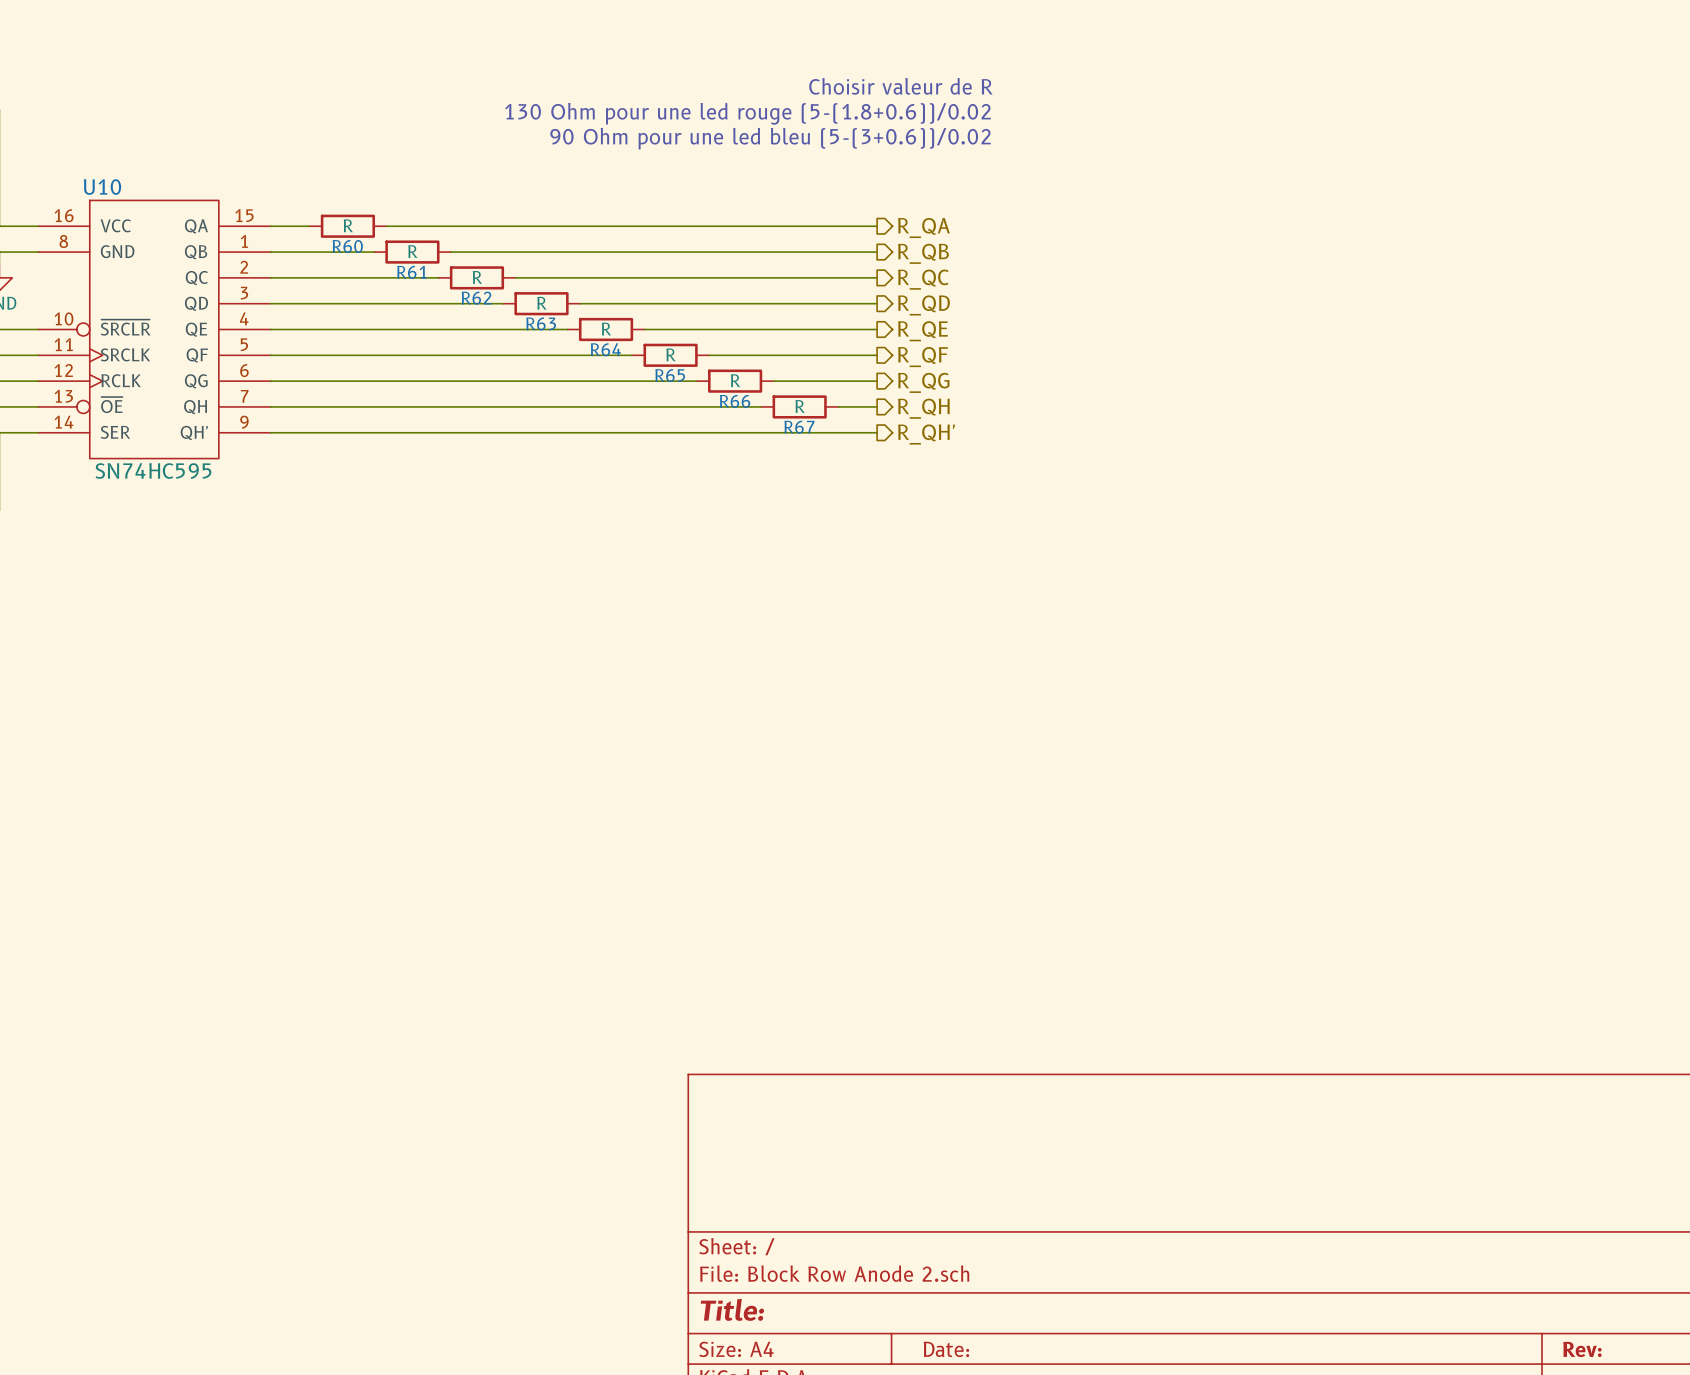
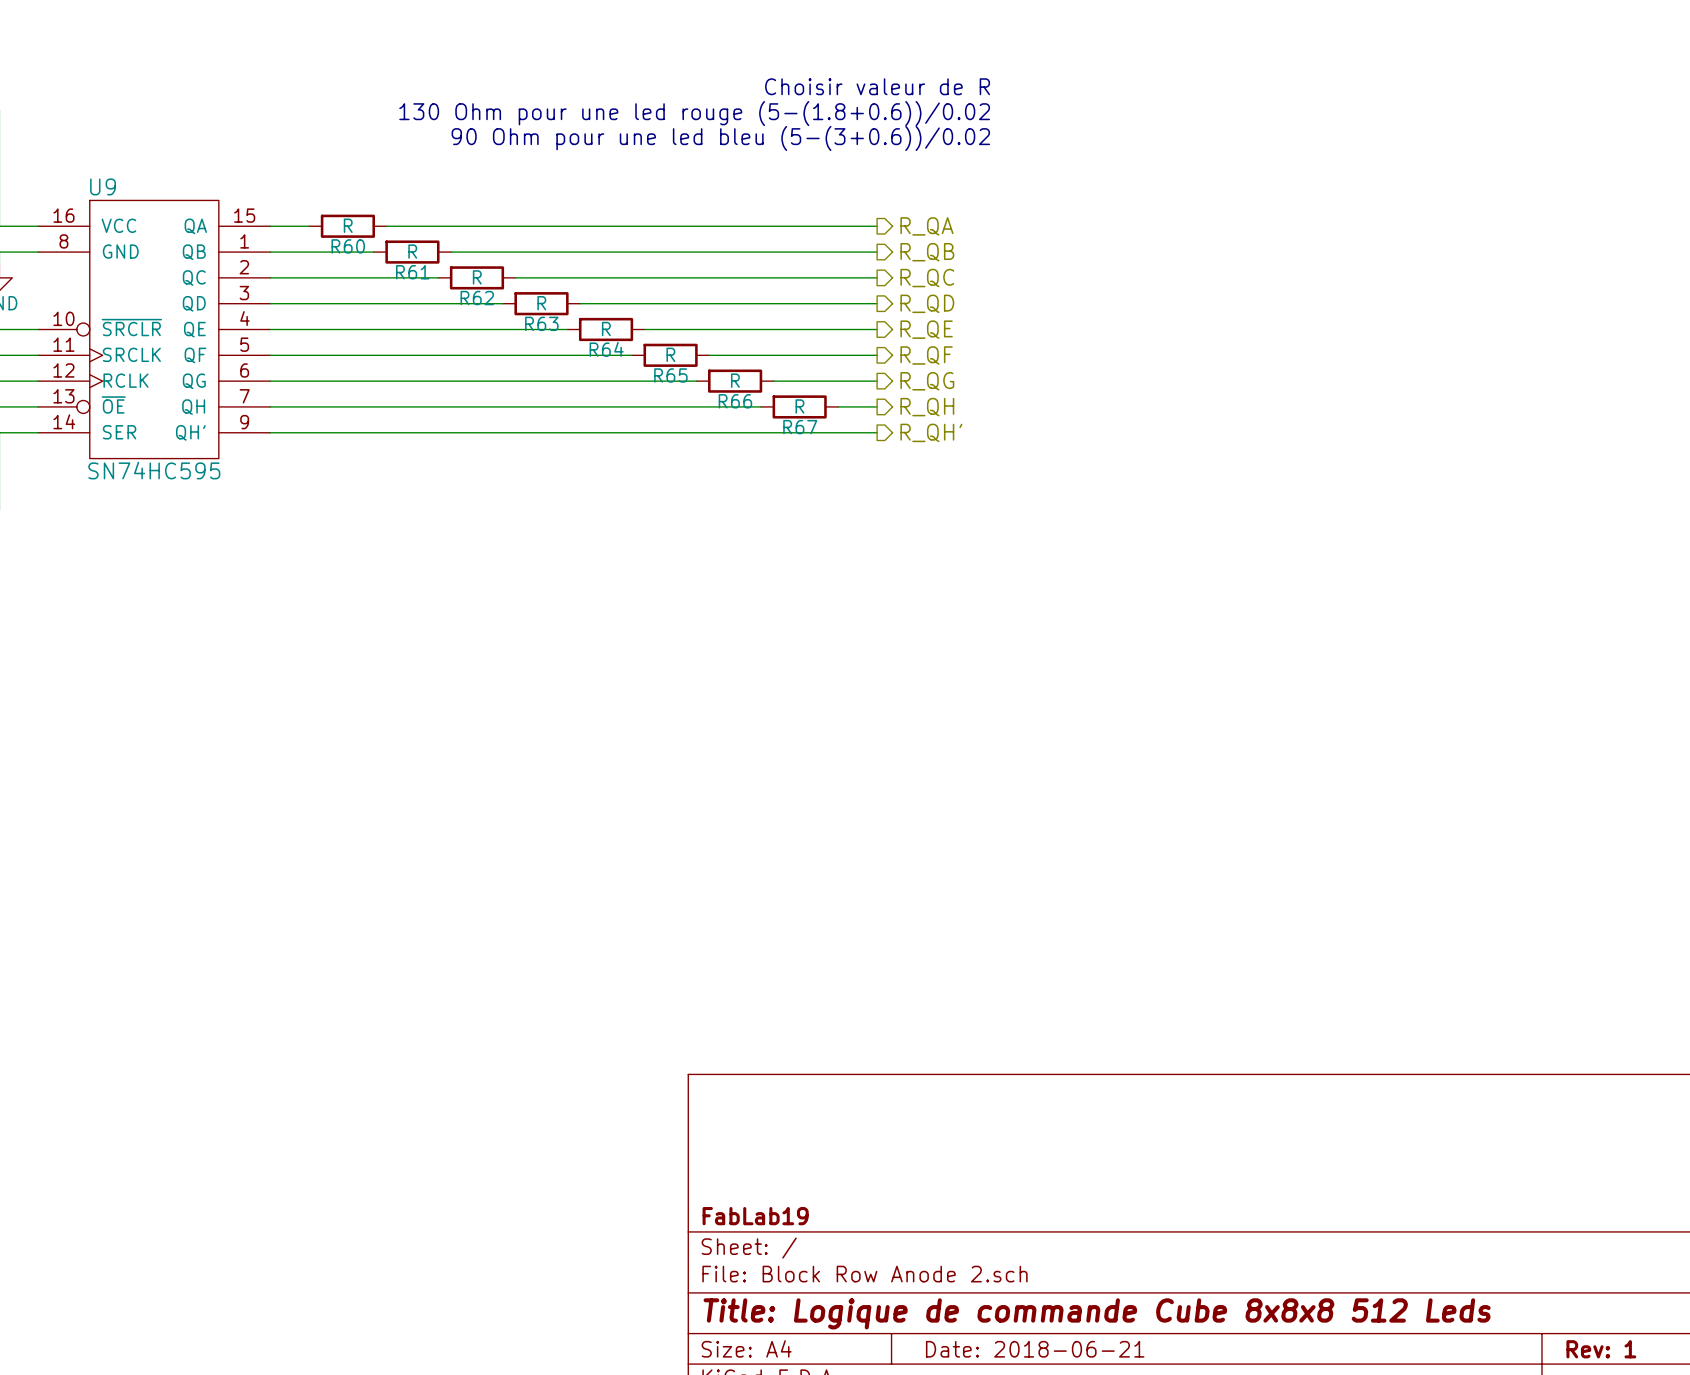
U10 name: U10 (102, 187) -> U9 (103, 186)
title block: none -> FabLab19 (755, 1216)
title block: Title: (732, 1309) -> Title: Logique de commande Cube 8x8x8 512 Leds (1097, 1313)
title block: Date: (946, 1349) -> Date: 2018-06-21 (1035, 1349)
title block: Rev: (1582, 1349) -> Rev: 1 (1601, 1349)

